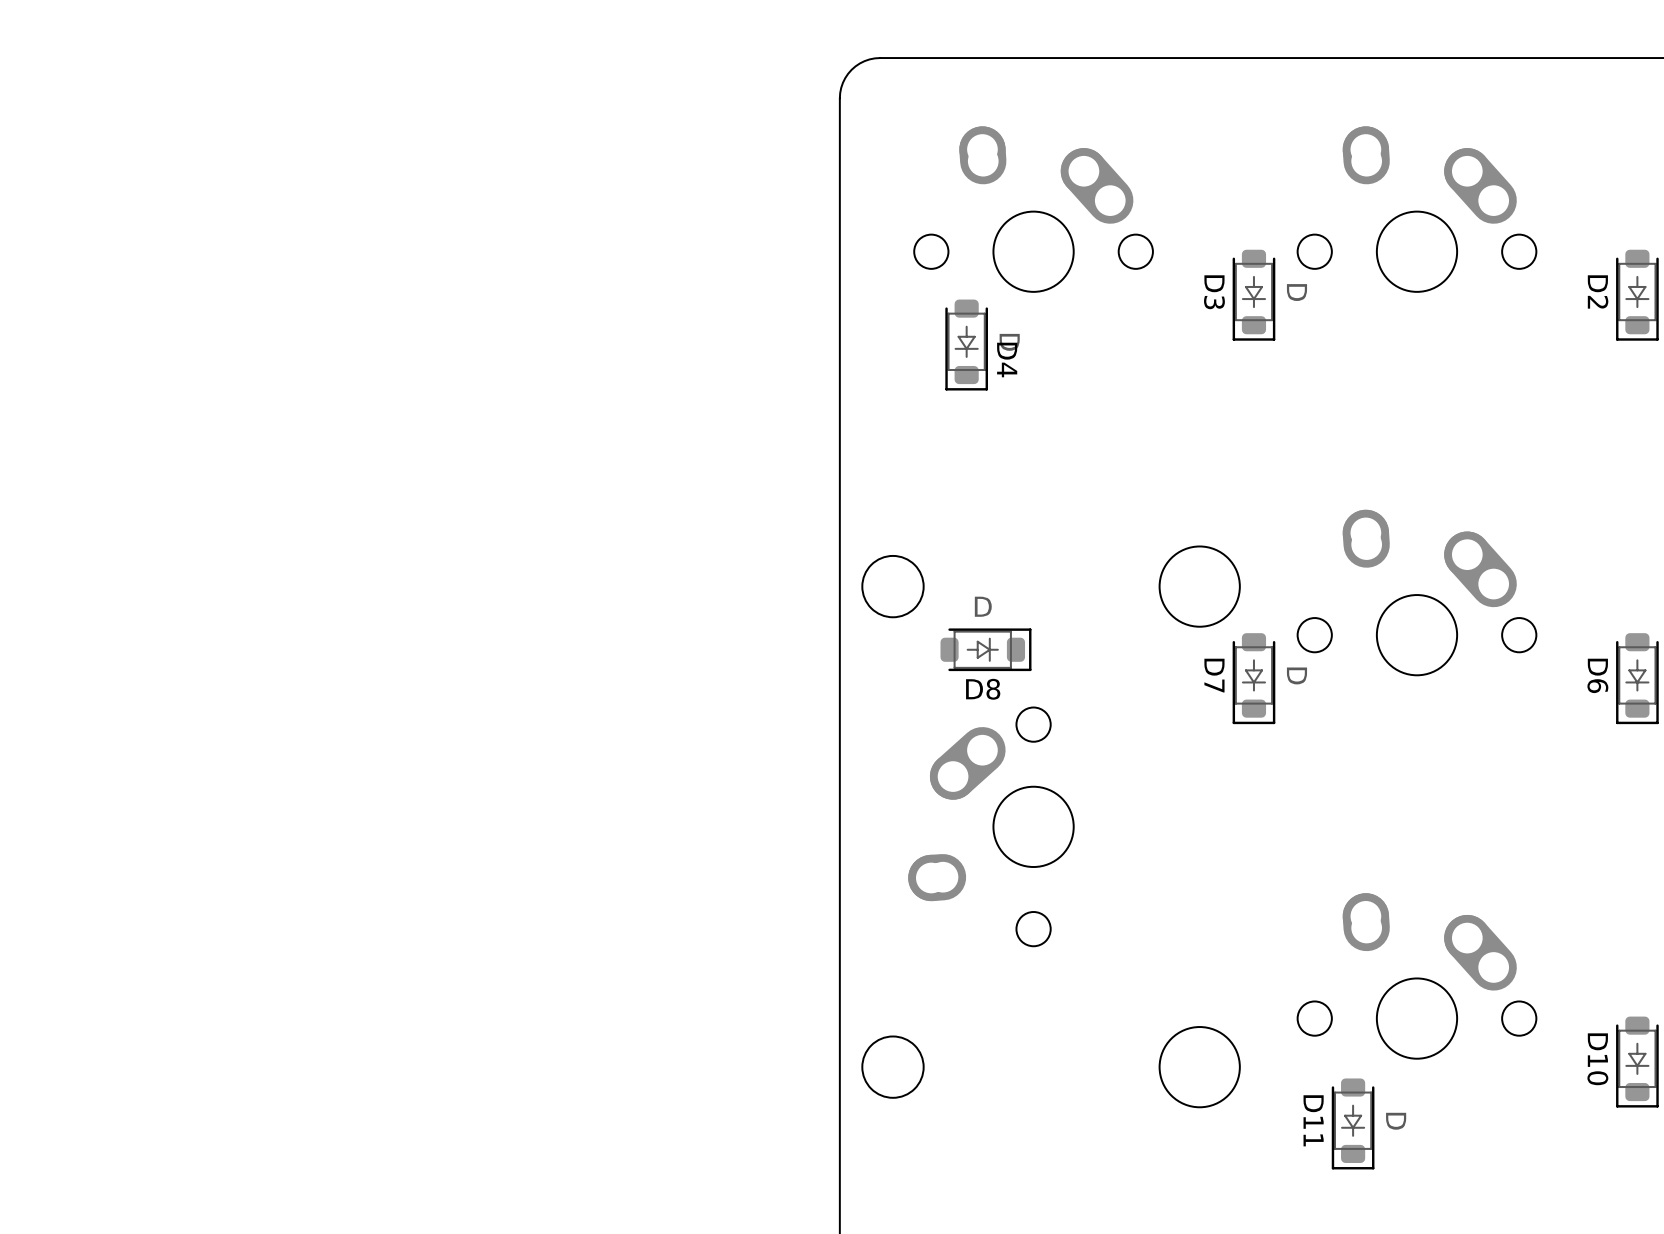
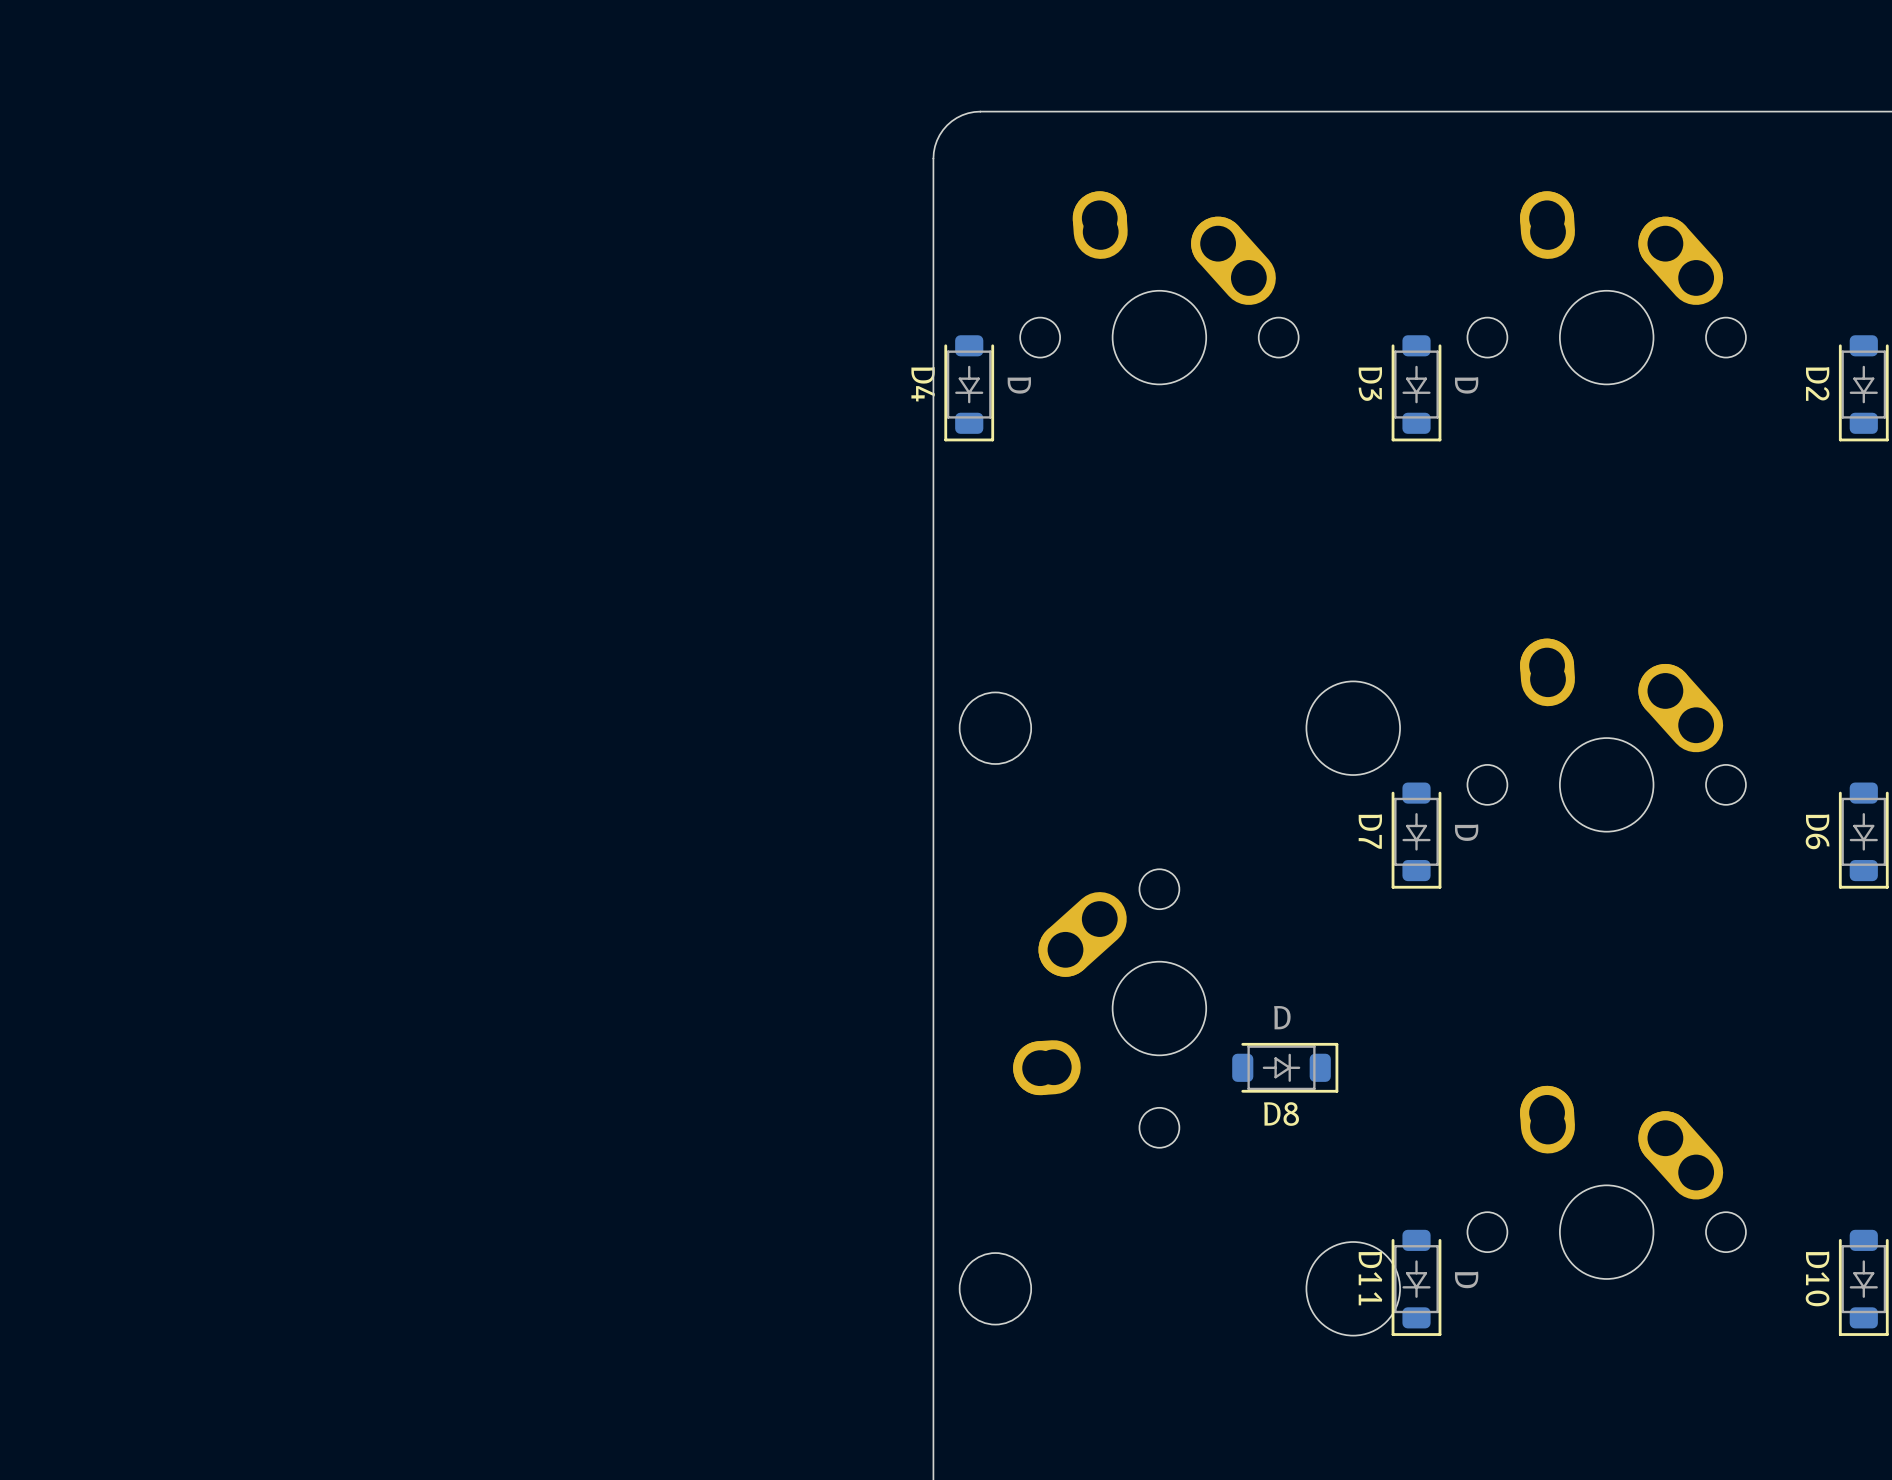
D4 position: (966, 345) -> (969, 388)
D4 name position: D4 (1007, 360) -> D4 (923, 384)
D8 position: (985, 649) -> (1285, 1067)
D11 position: (1353, 1123) -> (1416, 1282)

